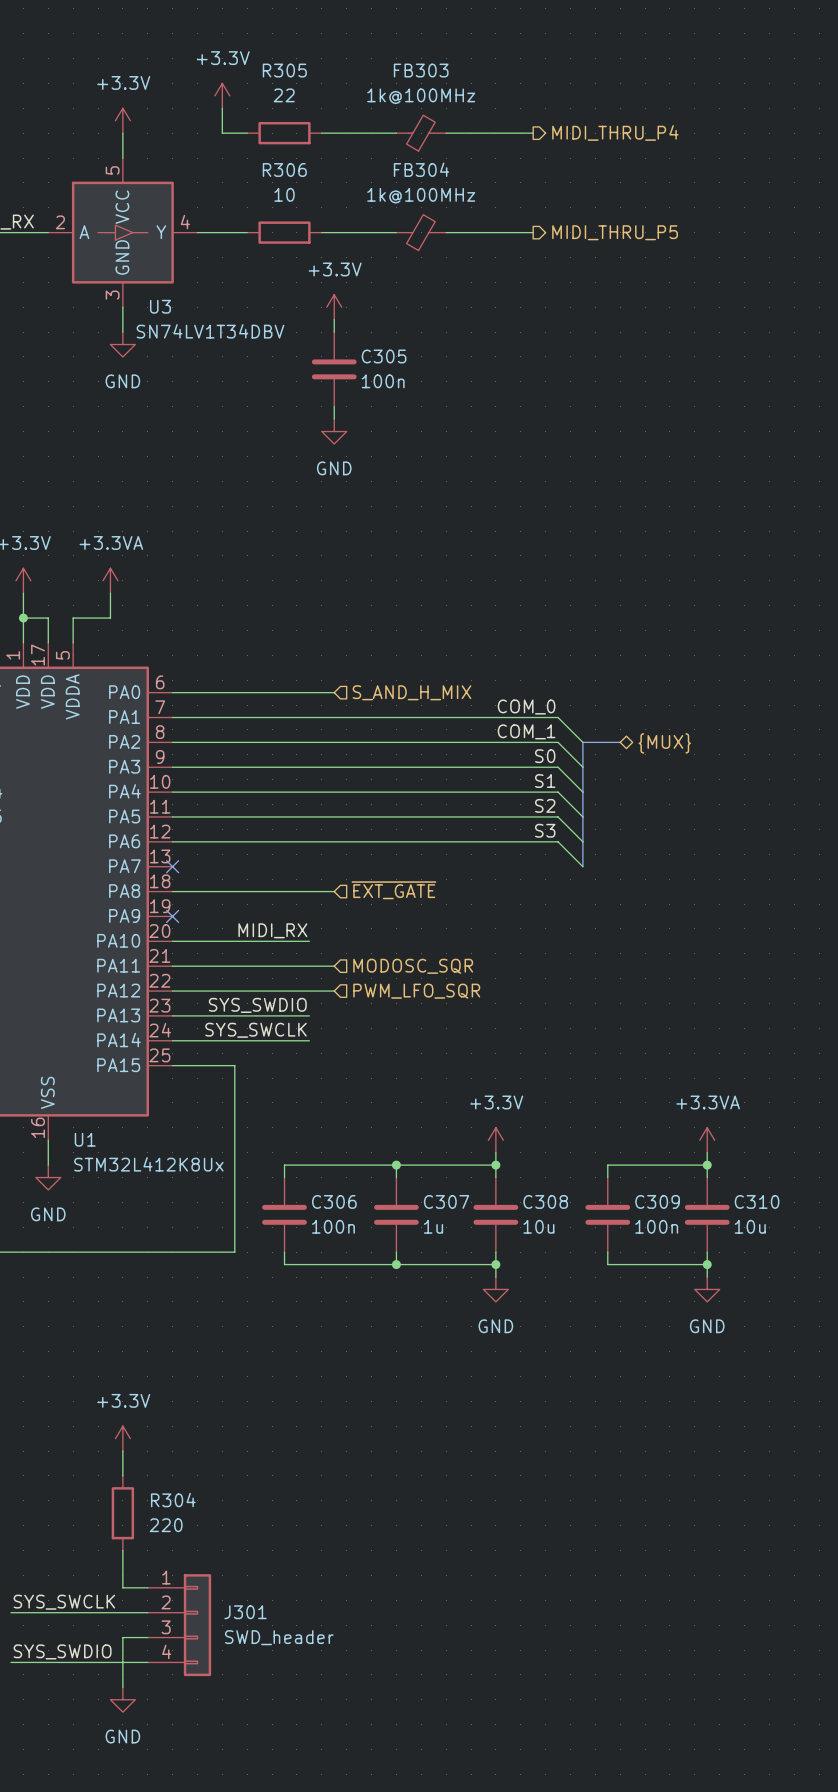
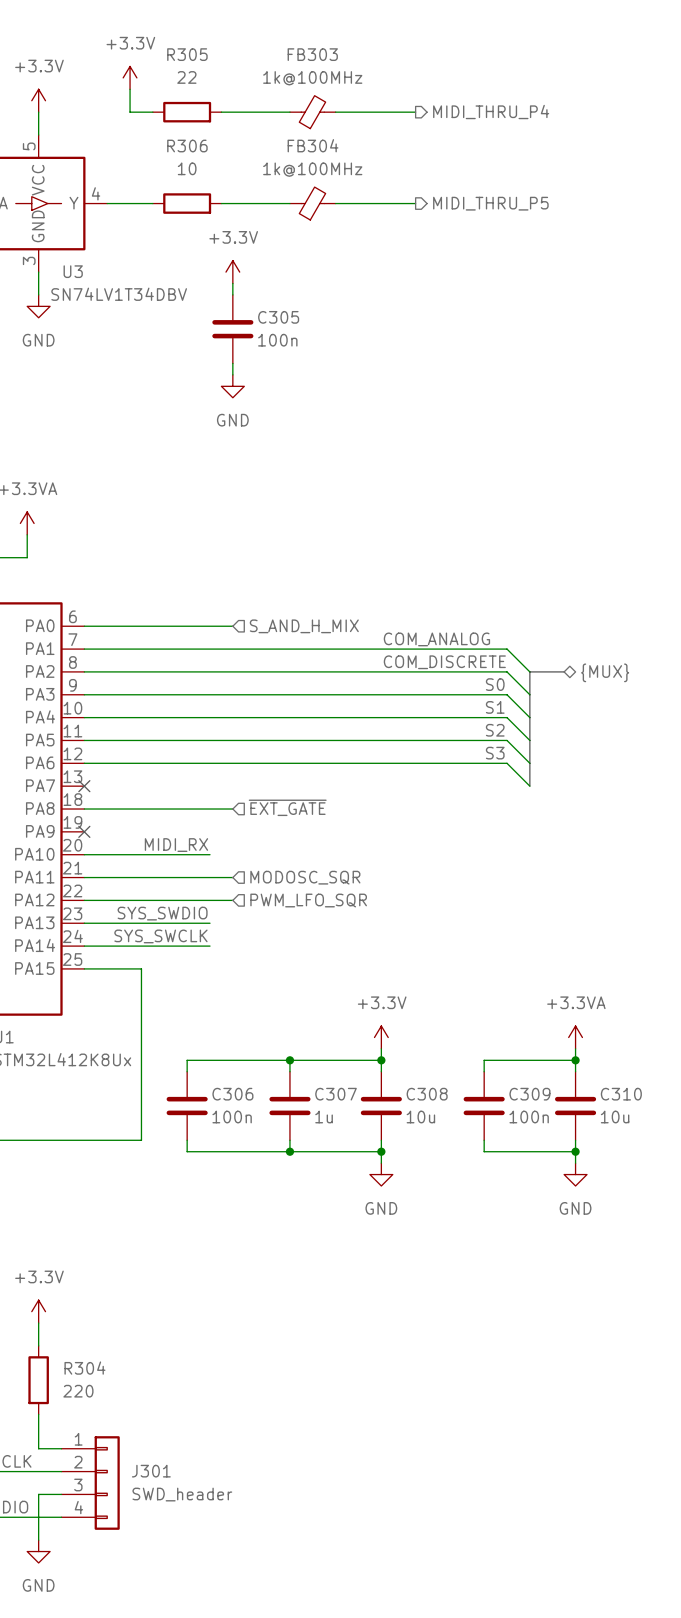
label: COM_0 (526, 707) -> none
label: none -> COM_ANALOG (436, 639)
wire: (558, 717) (582, 742) -> (438, 649) (507, 649) (529, 671)
label: COM_1 (526, 731) -> none
label: none -> COM_DISCRETE (444, 662)
wire: (558, 742) (582, 767) -> (438, 671) (507, 671) (529, 694)
bus: (620, 742) (582, 742) (582, 866) -> (564, 671) (529, 671) (529, 786)
hierarchical label position: {MUX} (664, 743) -> {MUX} (605, 672)
label position: S0 (545, 756) -> S0 (495, 684)
wire: (558, 767) (582, 792) -> (438, 694) (507, 694) (529, 717)
label position: S1 (545, 781) -> S1 (495, 707)
wire: (558, 792) (582, 816) -> (438, 717) (507, 717) (529, 740)
label position: S2 (545, 805) -> S2 (495, 730)
wire: (558, 816) (582, 841) -> (438, 740) (507, 740) (529, 763)
label position: S3 (545, 830) -> S3 (495, 753)
wire: (558, 841) (582, 866) -> (438, 763) (507, 763) (529, 786)

